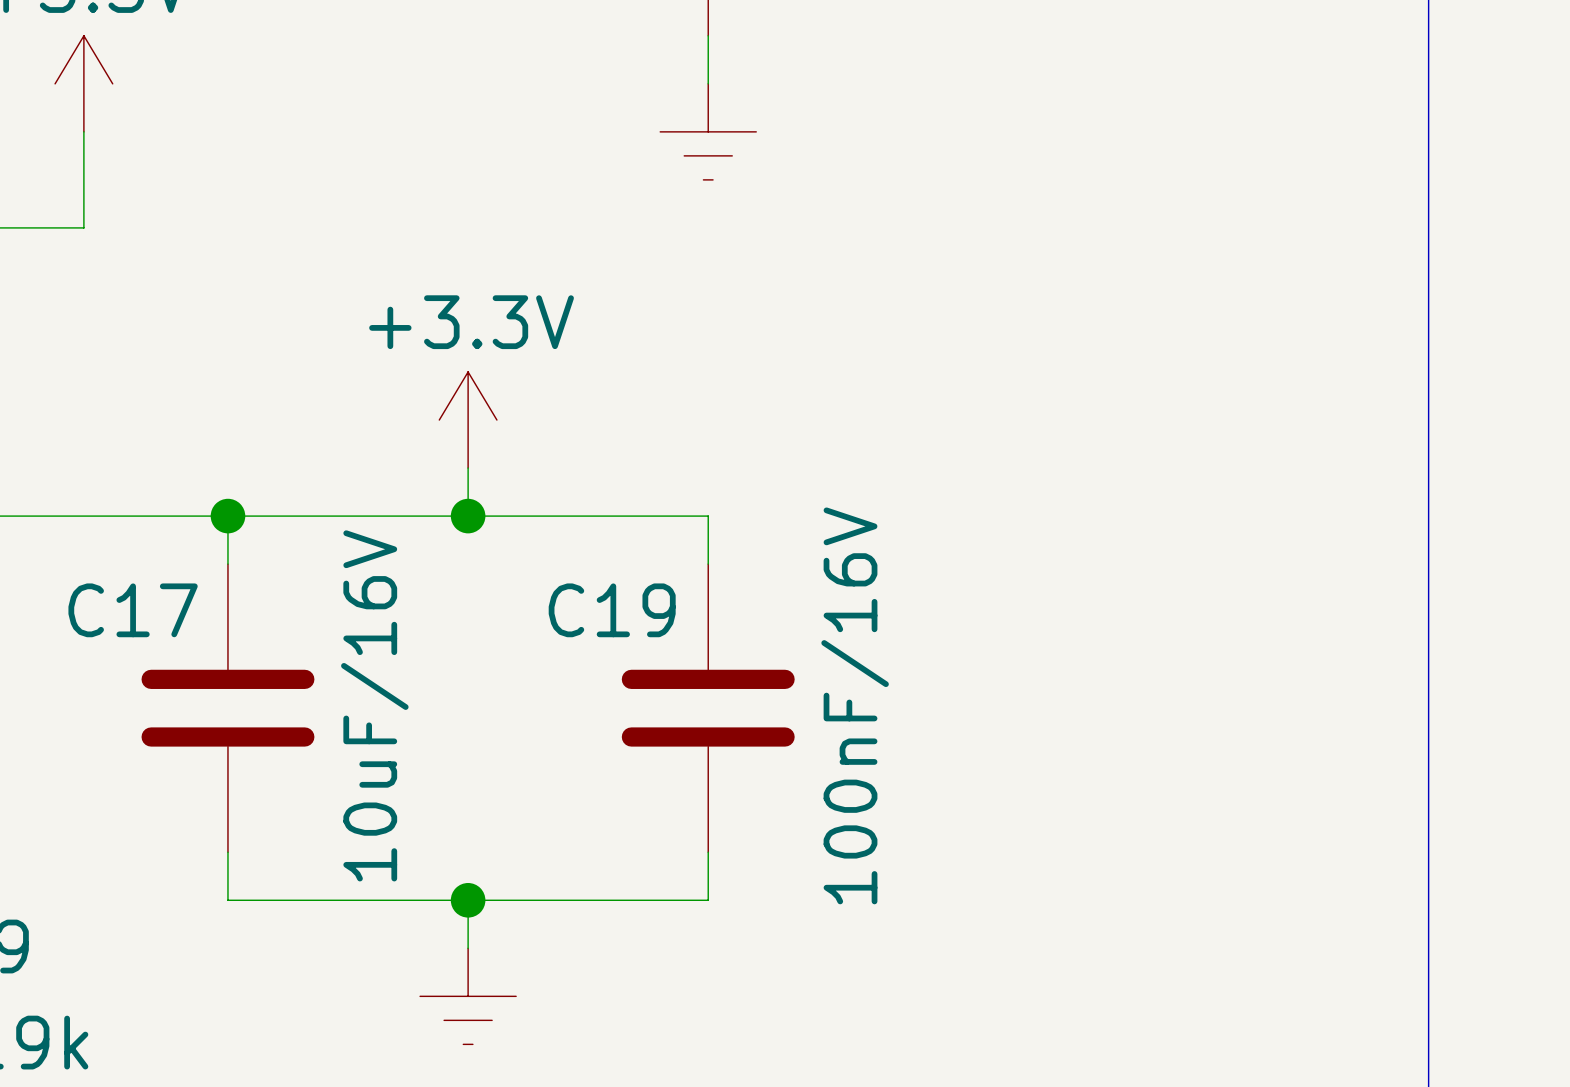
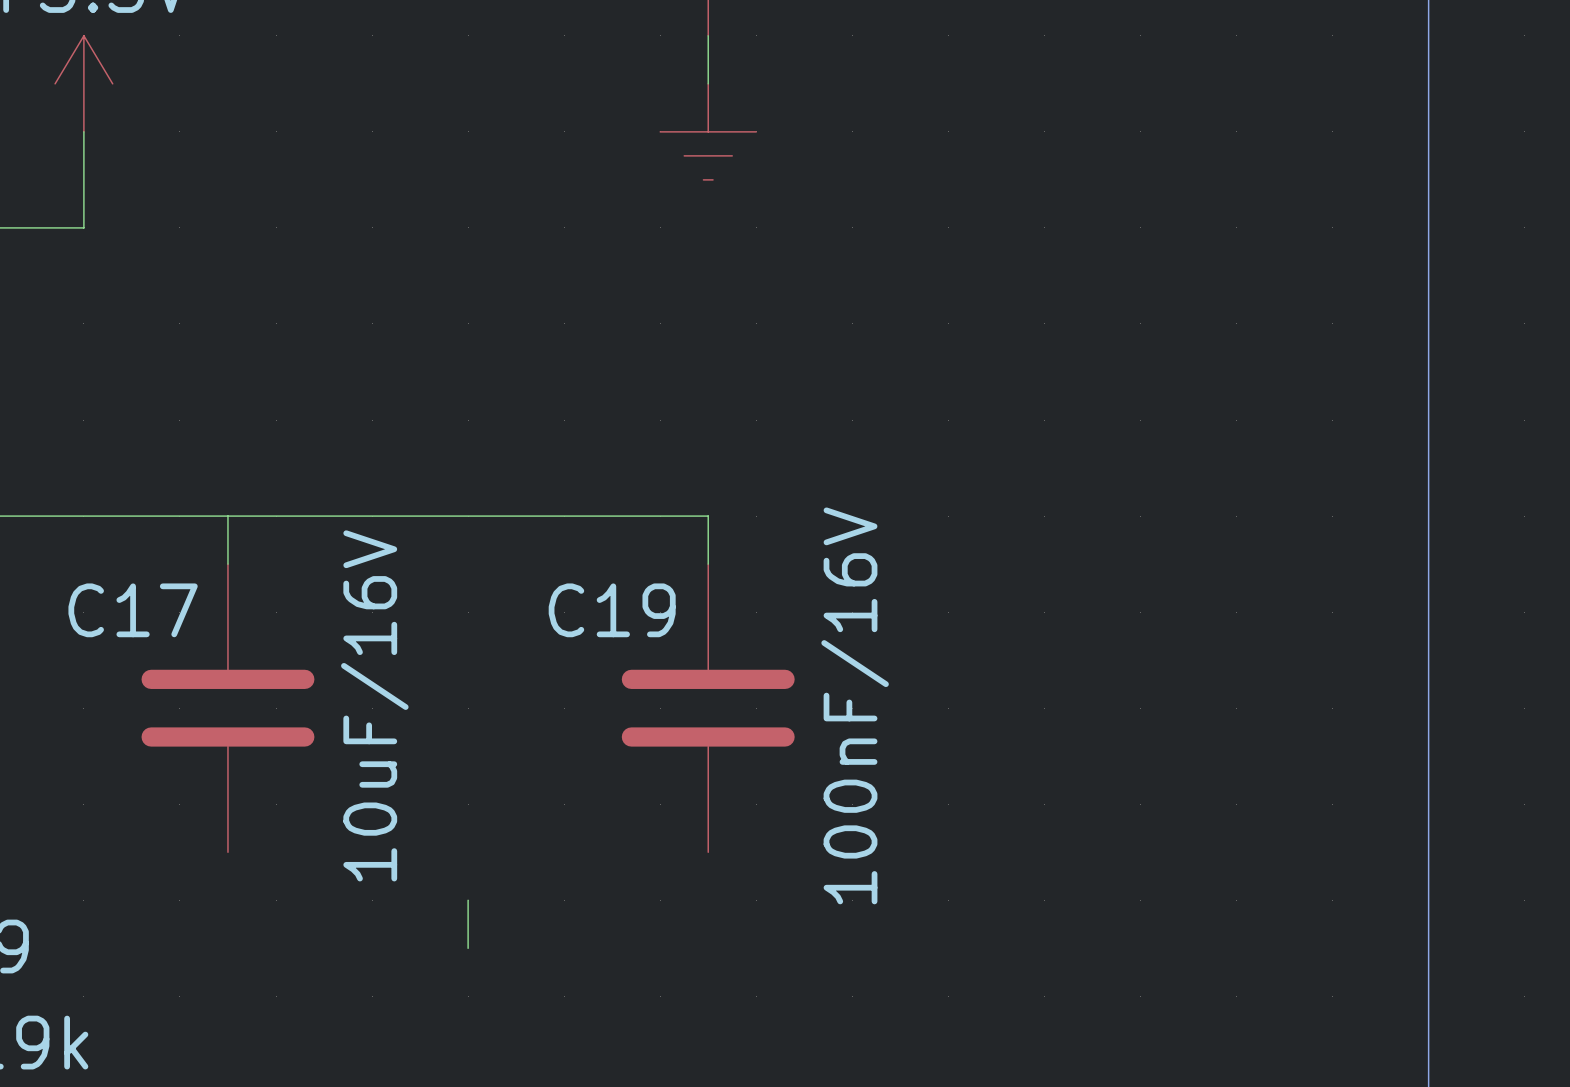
power symbol: +3.3V (468, 420) -> none
wire: (468, 468) (468, 516) -> none
junction: (227, 516) -> none
junction: (468, 516) -> none
wire: (227, 852) (227, 900) (708, 900) (708, 852) -> none
junction: (468, 900) -> none
power symbol: (468, 996) -> none

